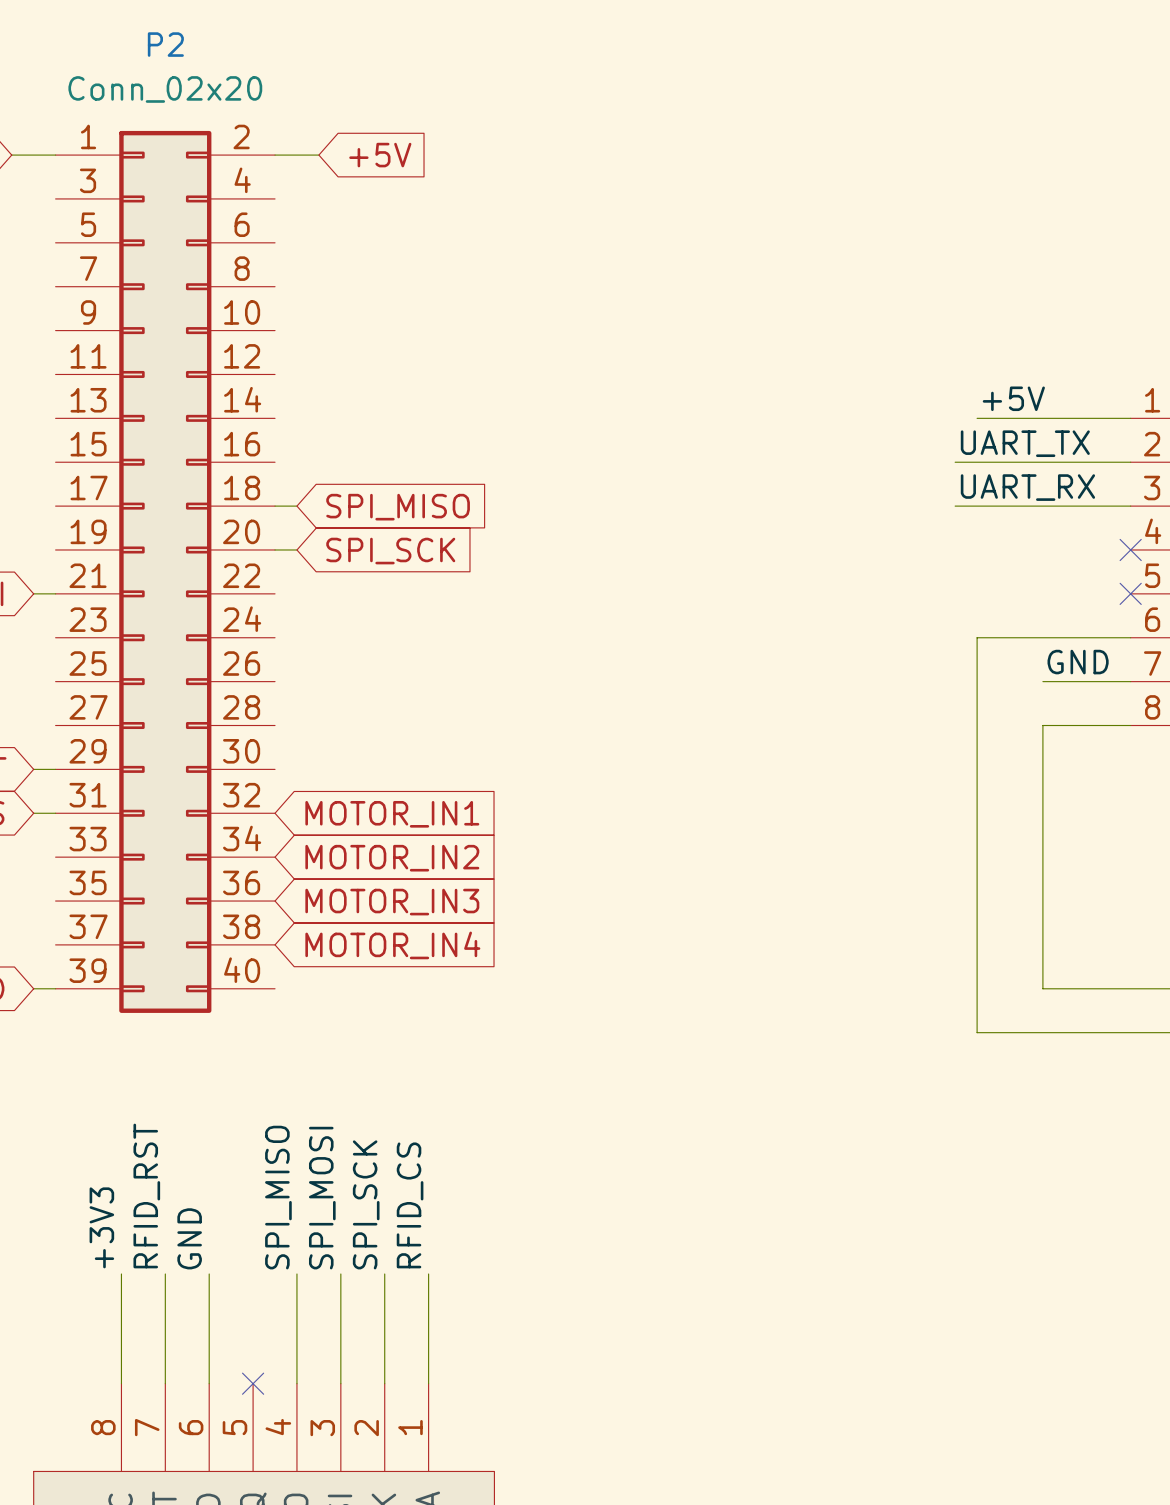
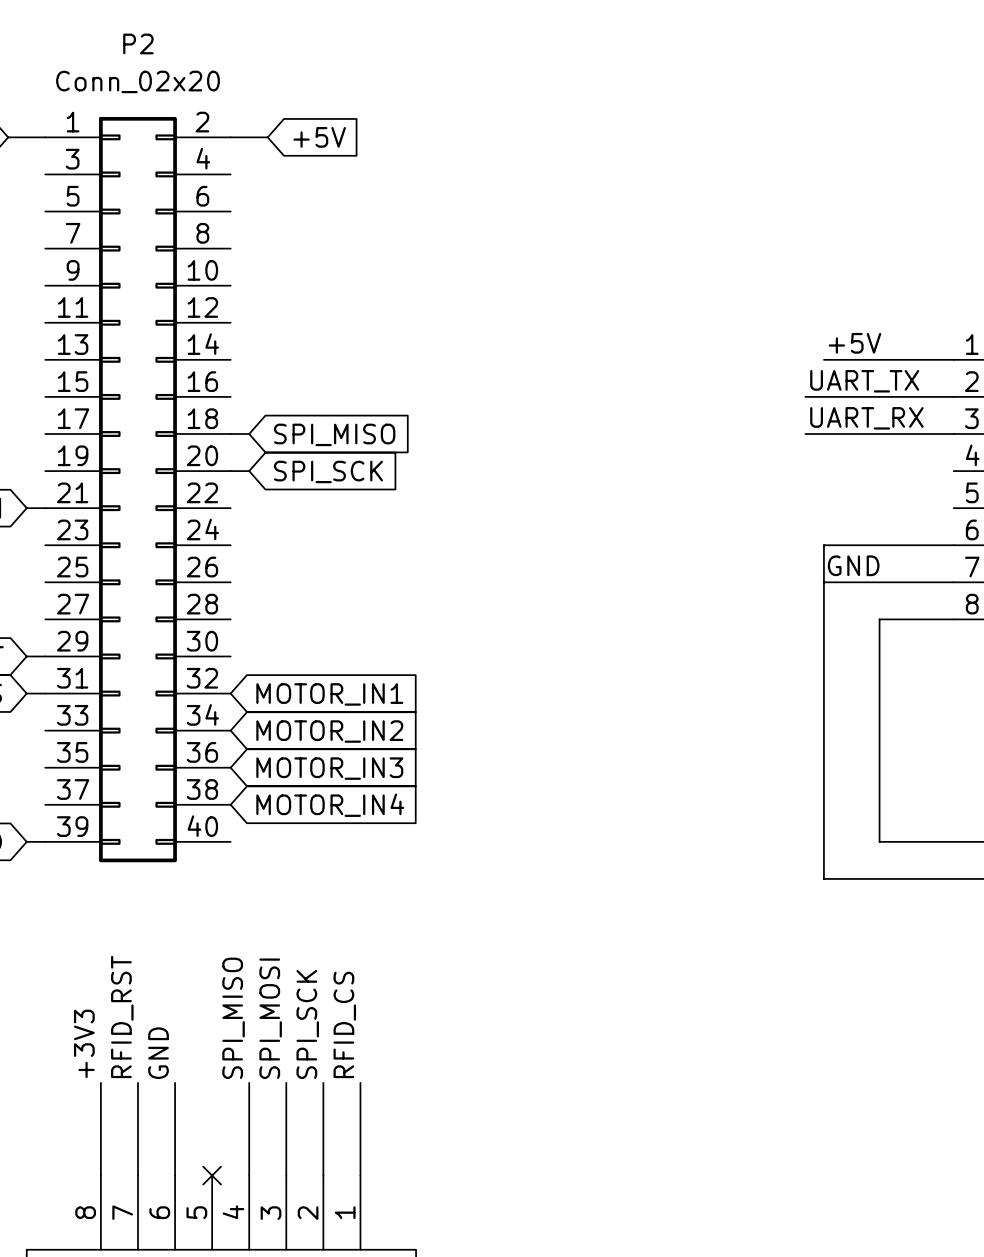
no-connect mark: (1130, 549) -> none
no-connect mark: (1130, 593) -> none
label position: GND (1078, 662) -> GND (853, 565)
wire: none -> (823, 582) (879, 582)

